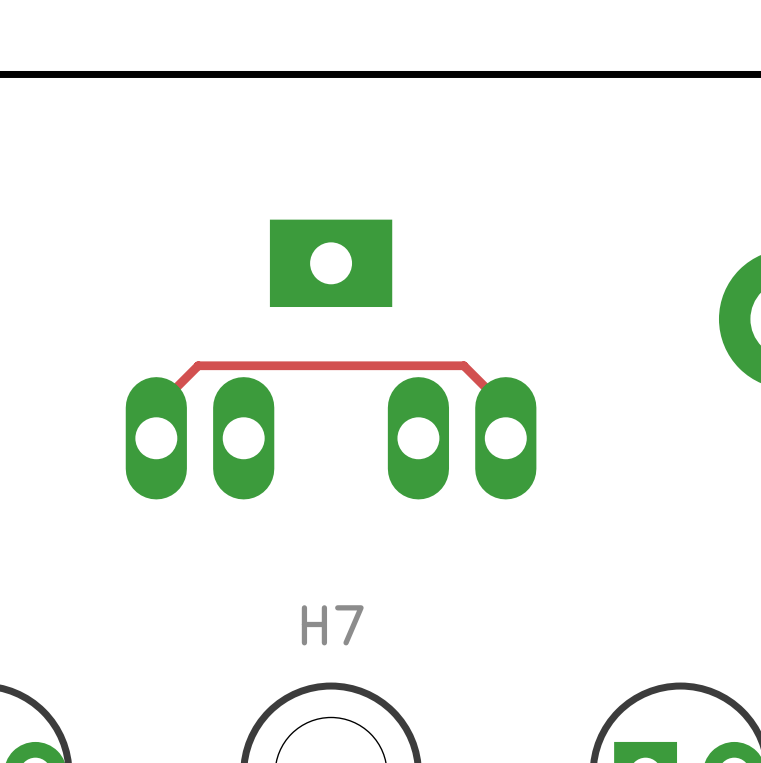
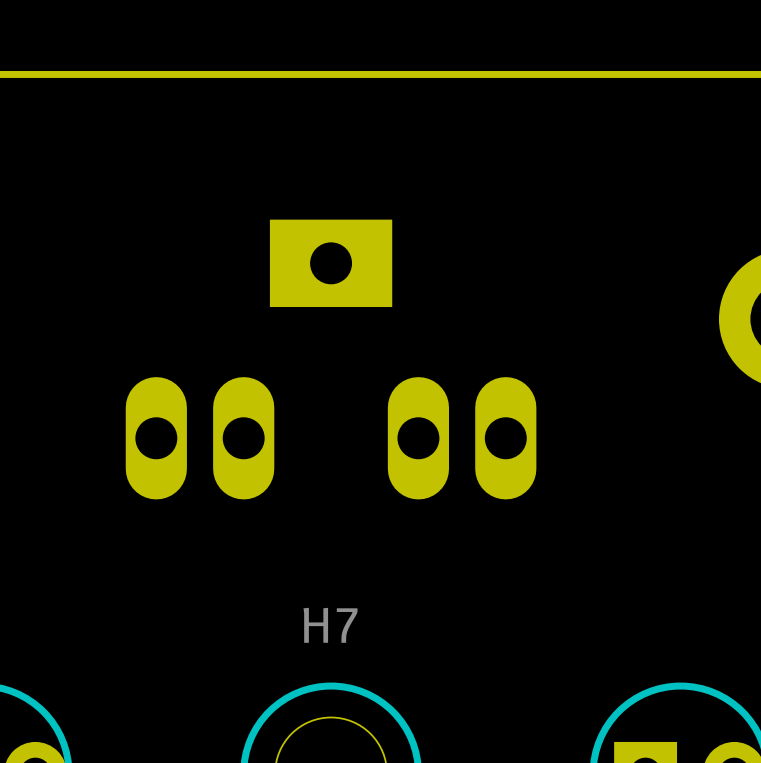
track: (156, 438) (156, 407) (198, 365) (463, 365) (505, 407) (505, 438) -> none

